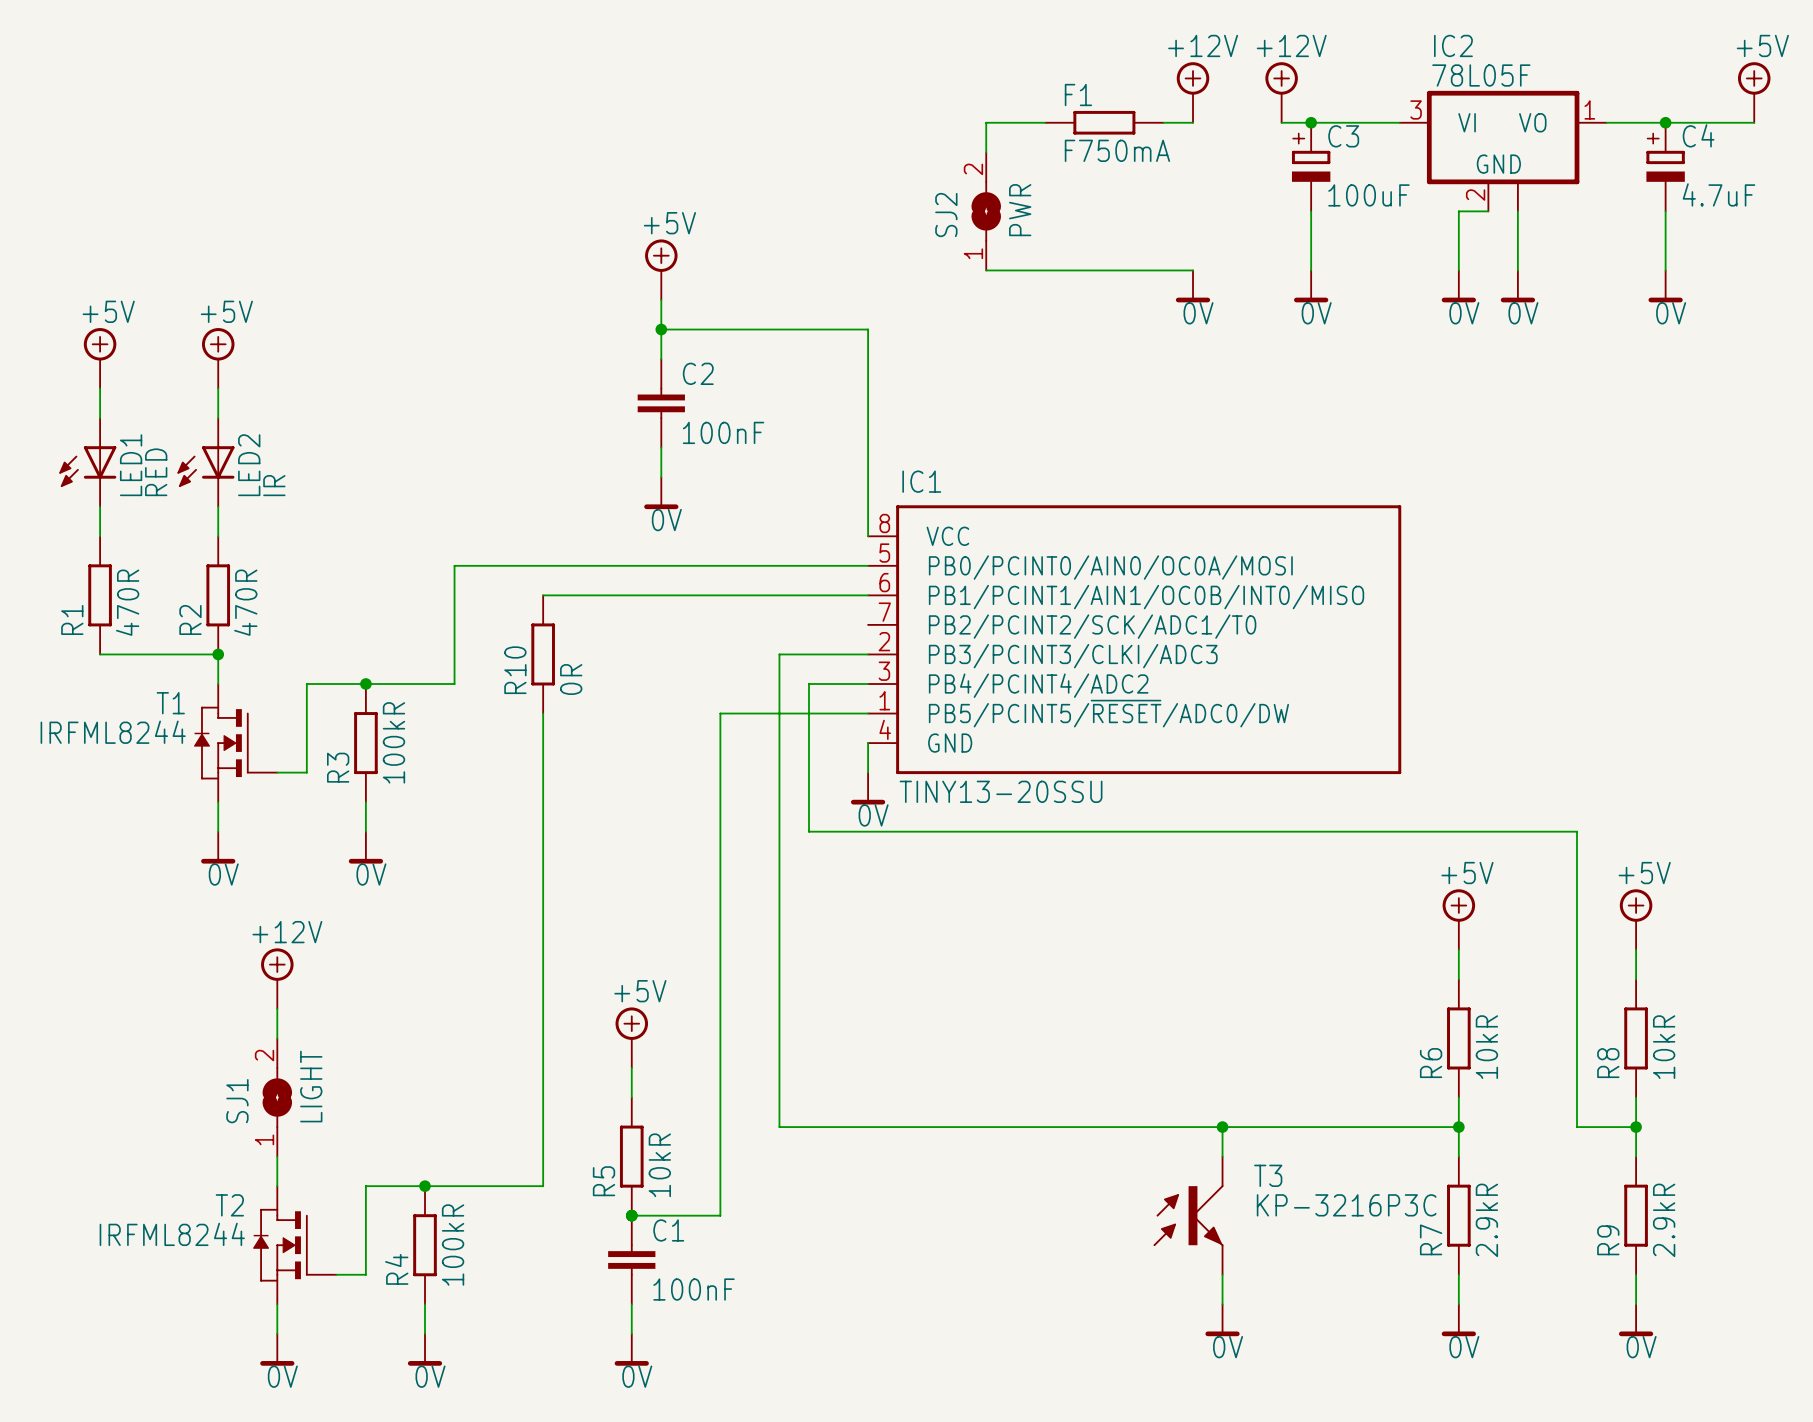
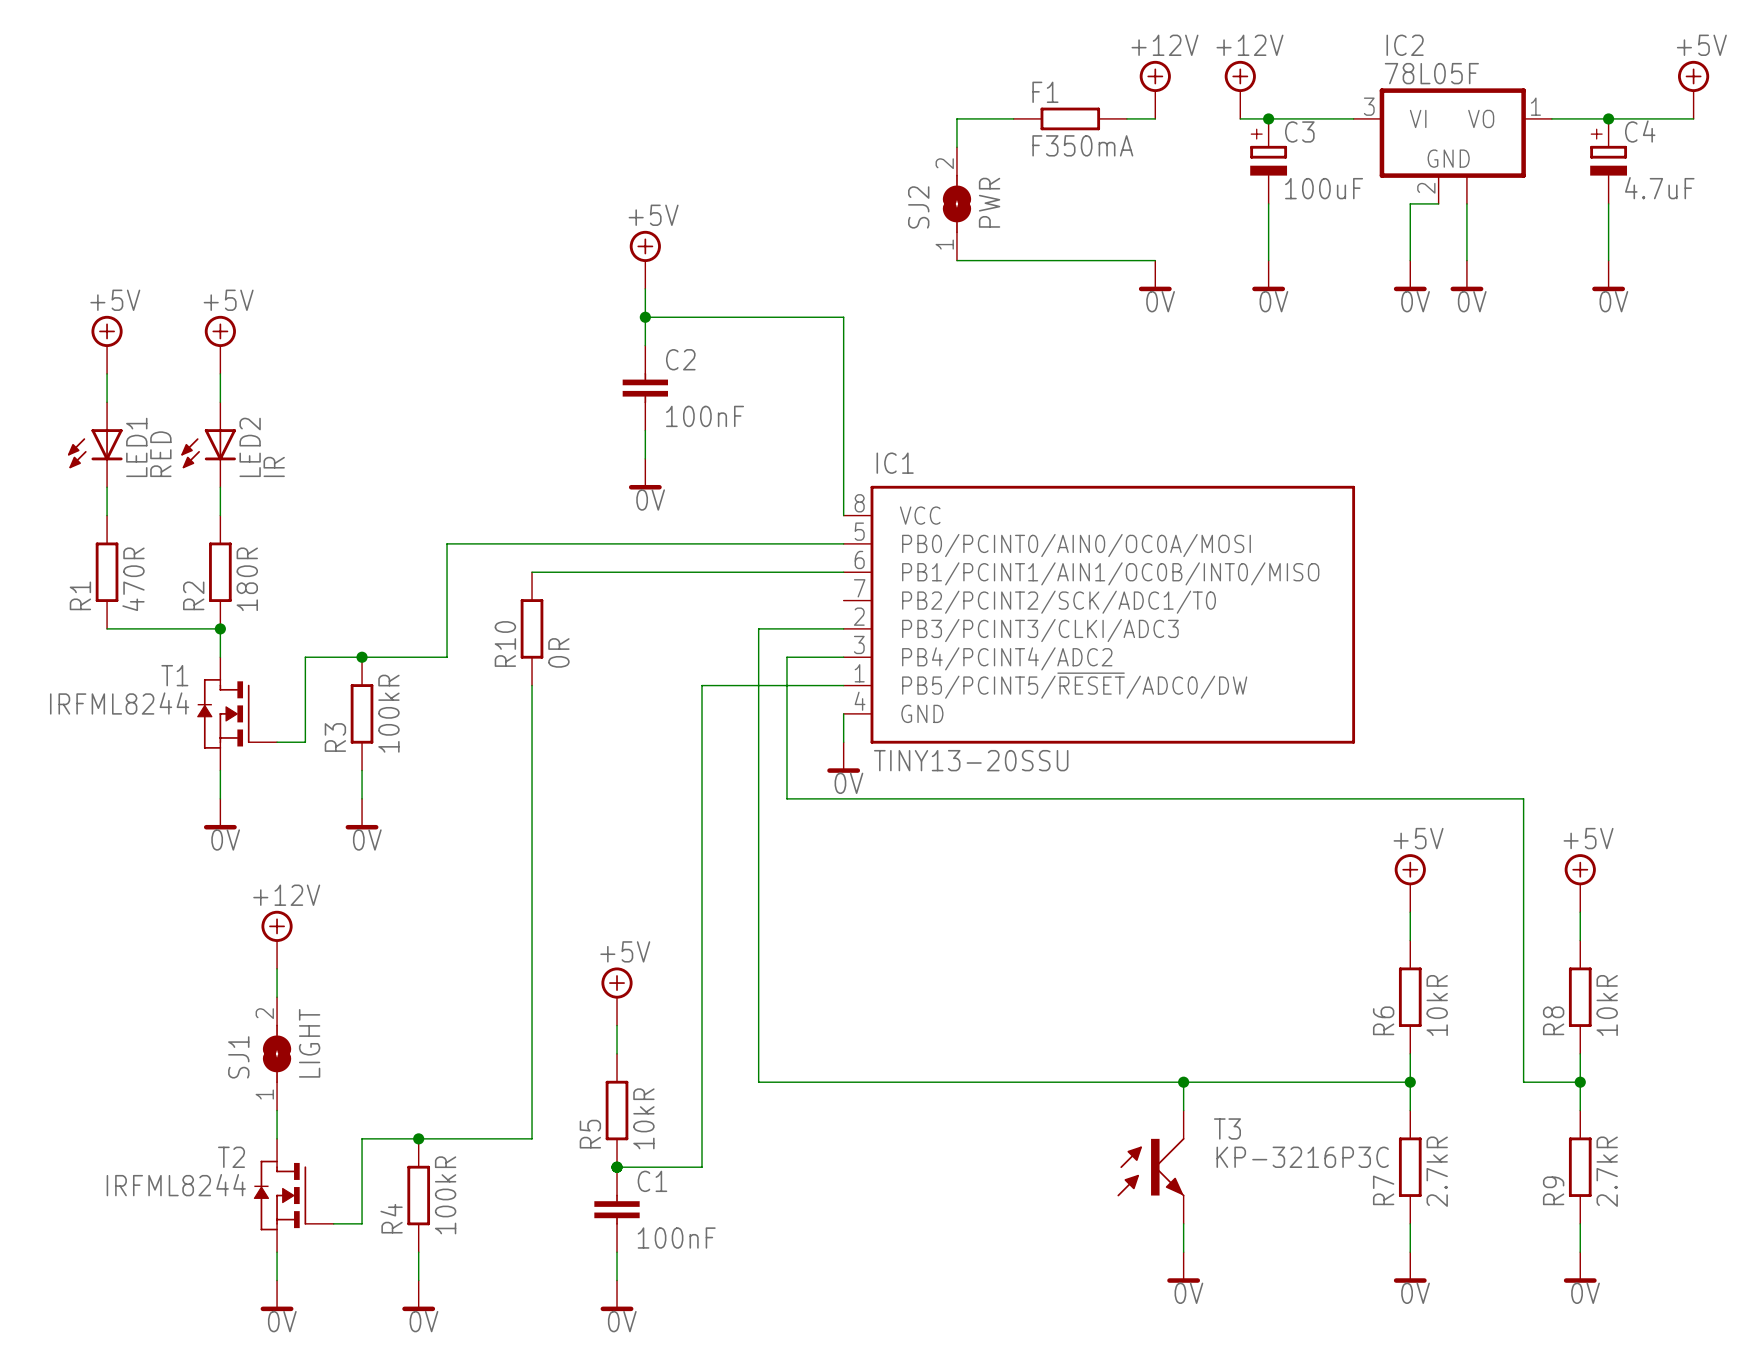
F1 value: F750mA (1117, 150) -> F350mA (1082, 145)
R2 value: 470R (245, 602) -> 180R (247, 579)
R7 value: 2.9kR (1486, 1220) -> 2.7kR (1437, 1171)
R9 value: 2.9kR (1664, 1220) -> 2.7kR (1607, 1171)

